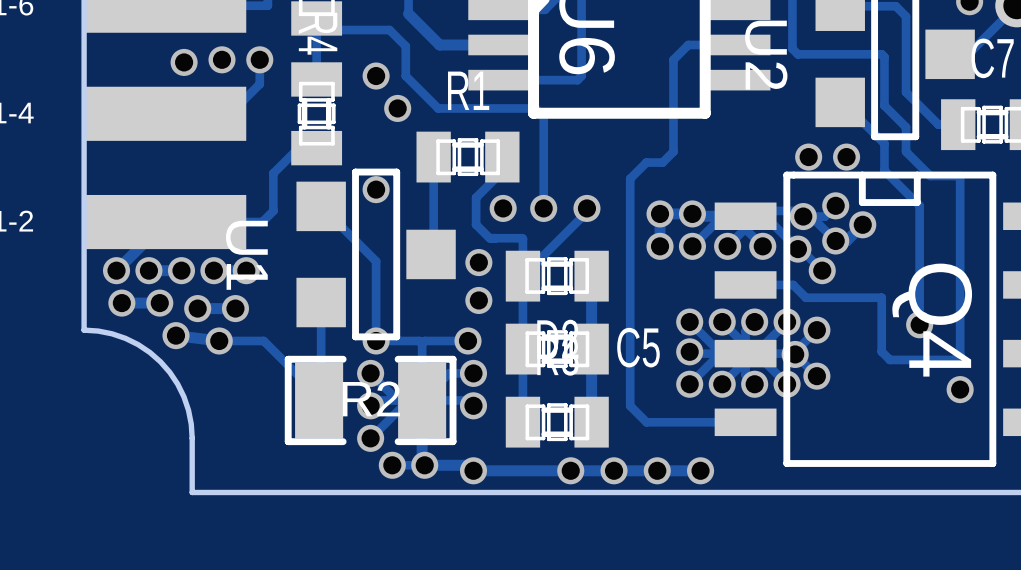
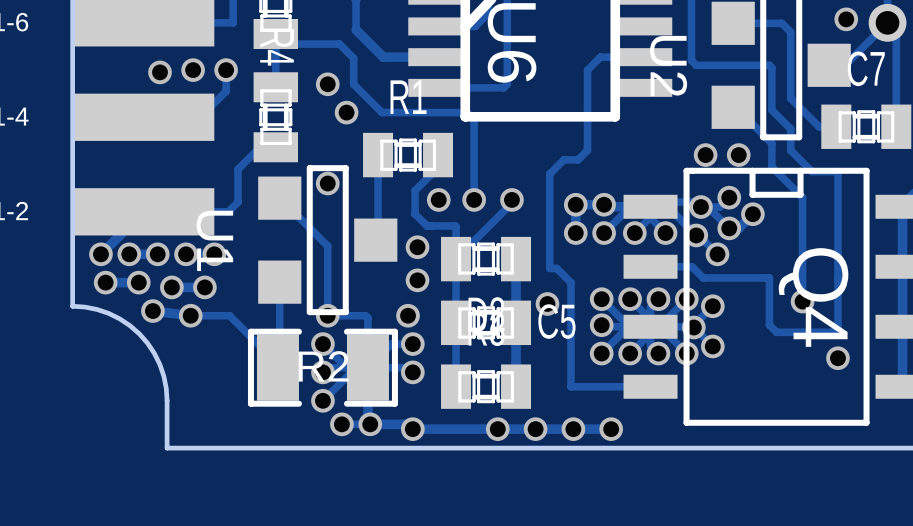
track: (630, 286) (630, 405) (646, 422) (654, 422) -> (549, 268) (556, 268) (570, 282) (570, 386)
via: none -> (547, 303)
track: (468, 340) (424, 340) (422, 343) -> none

